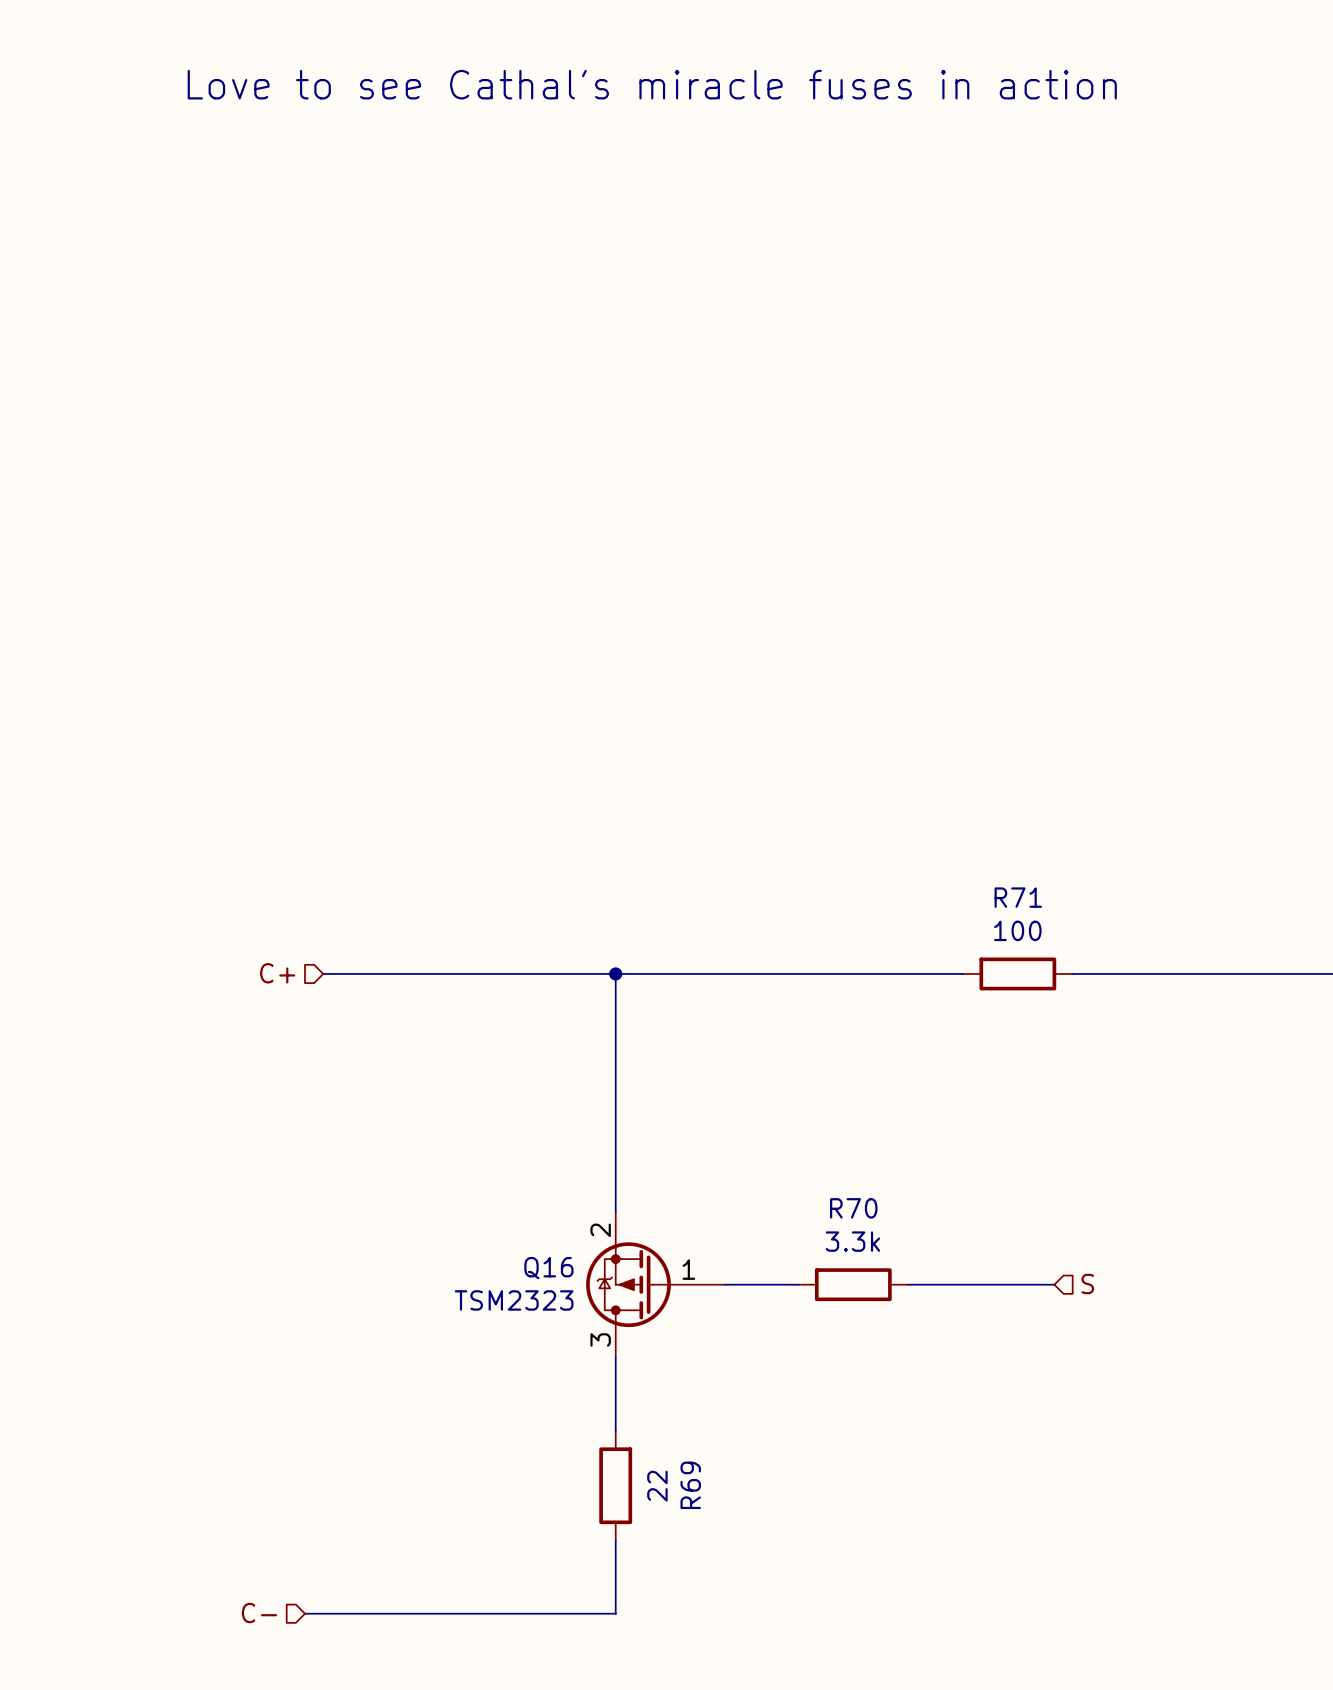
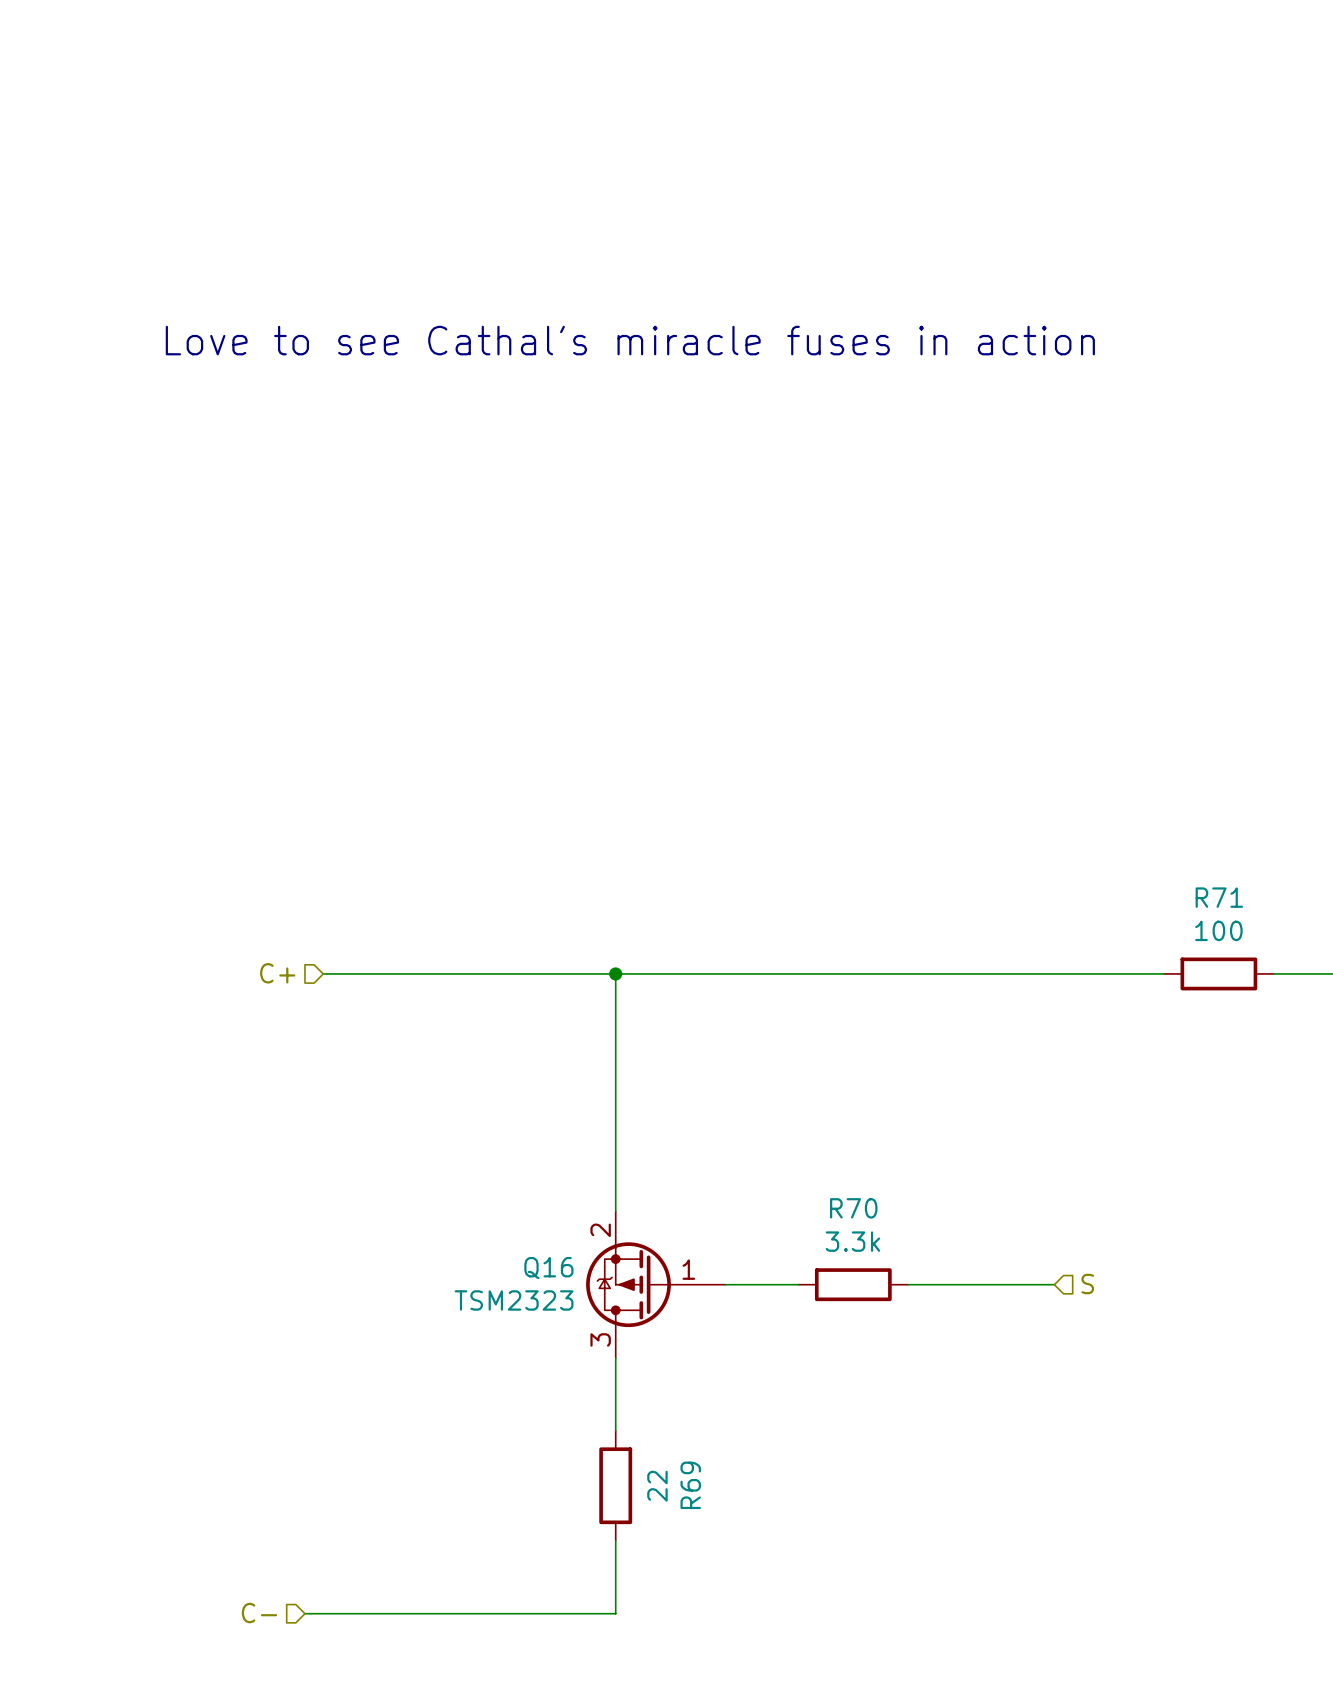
text position: Love to see Cathal's miracle fuses in action (652, 84) -> Love to see Cathal's miracle fuses in action (630, 340)
R71 position: (1017, 973) -> (1218, 973)
wire: (1164, 973) (1273, 973) -> (963, 973) (1072, 973)

